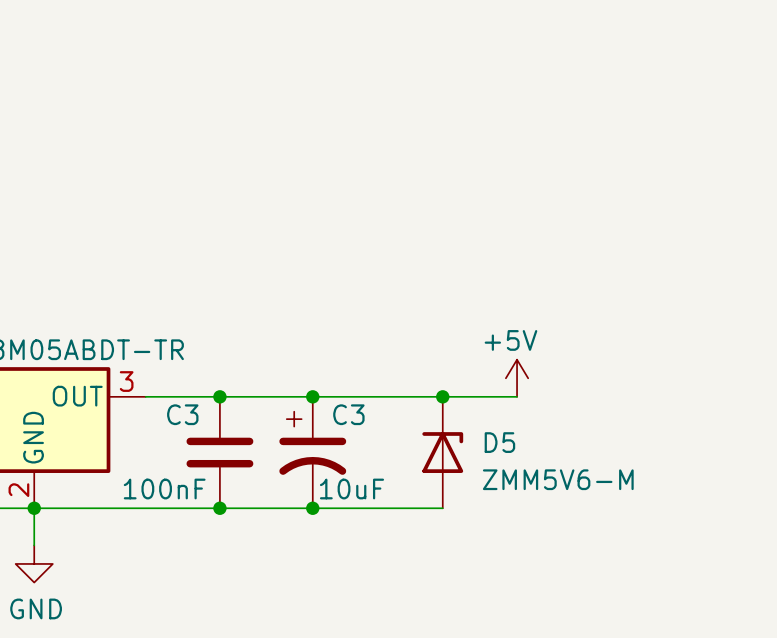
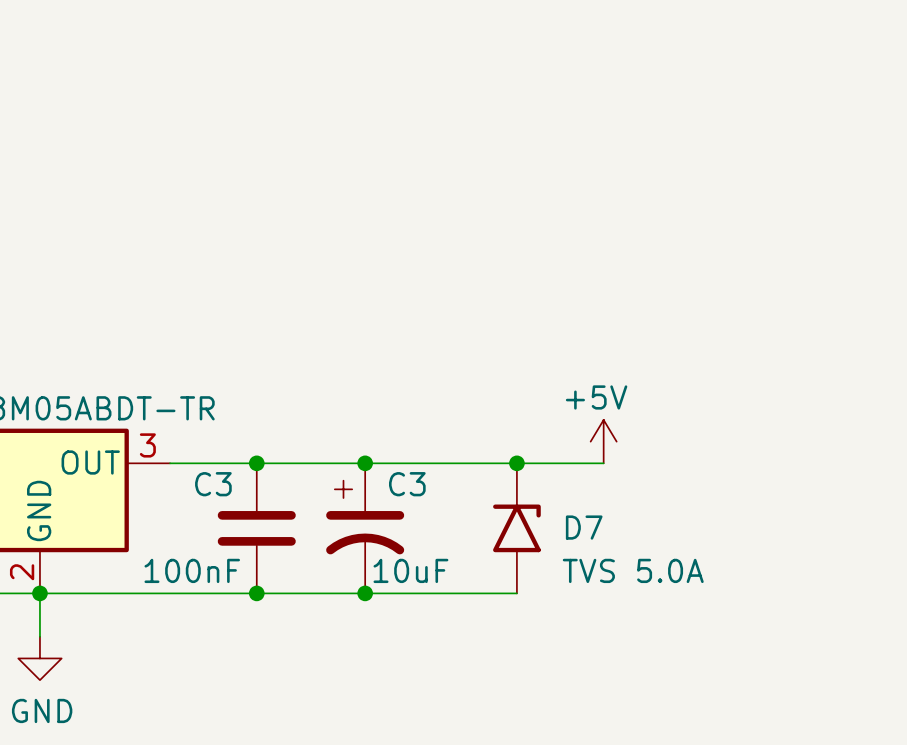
D5: ZMM5V6-M (442, 452) -> none
D7: none -> TVS 5.0A (516, 528)

